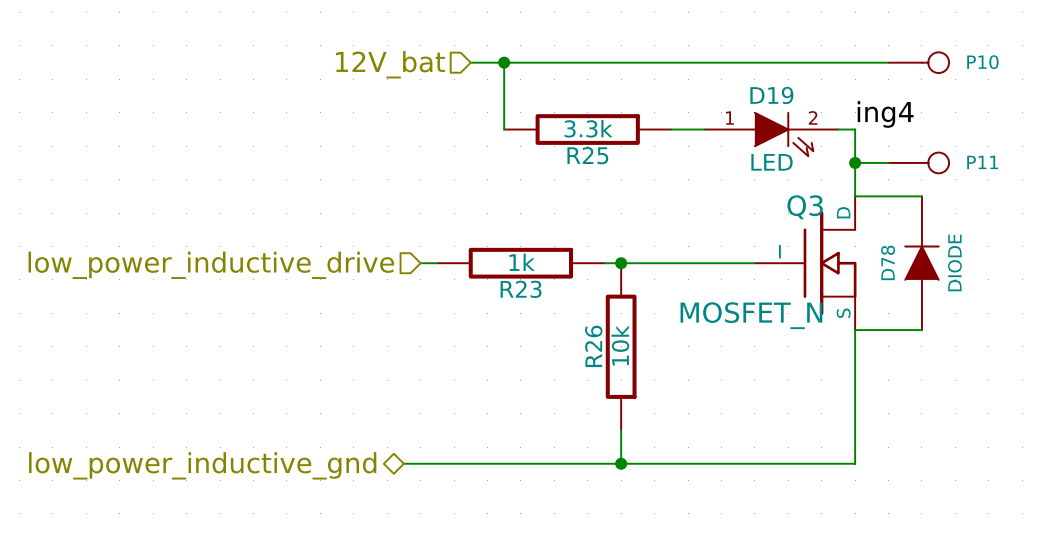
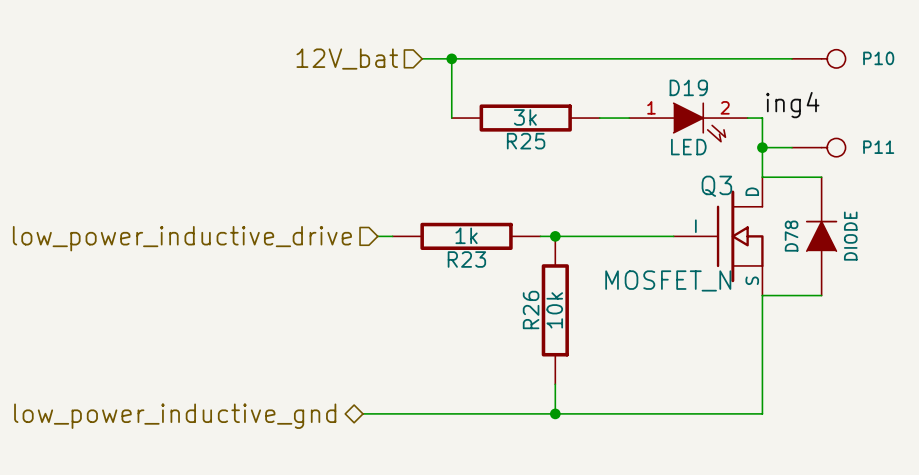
R25 value: 3.3k (588, 128) -> 3k (525, 117)

